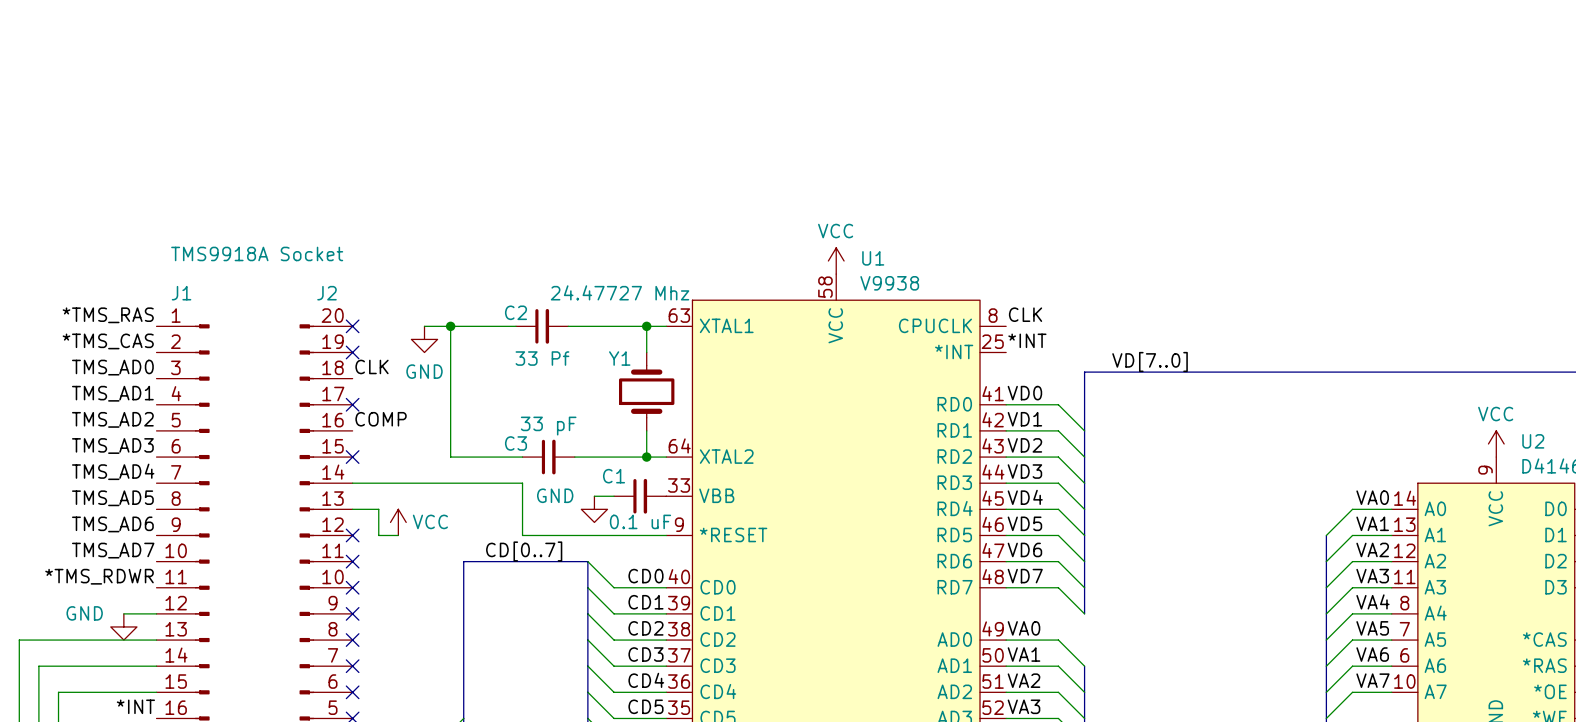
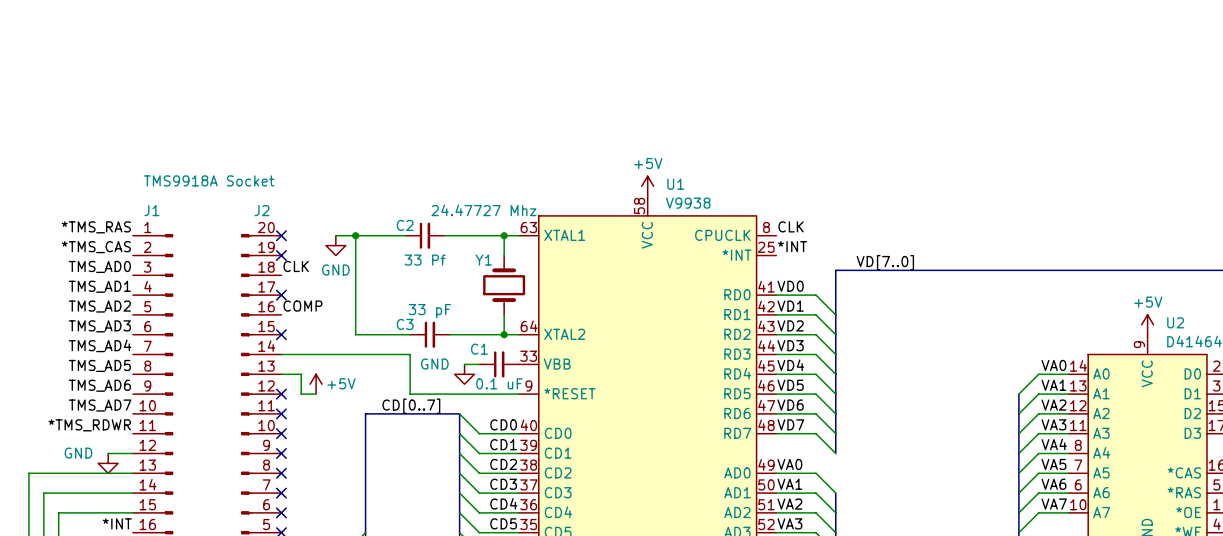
power symbol: VCC (836, 260) -> +5V (647, 186)
power symbol: VCC (1496, 443) -> +5V (1147, 324)
power symbol: VCC (398, 522) -> +5V (316, 384)

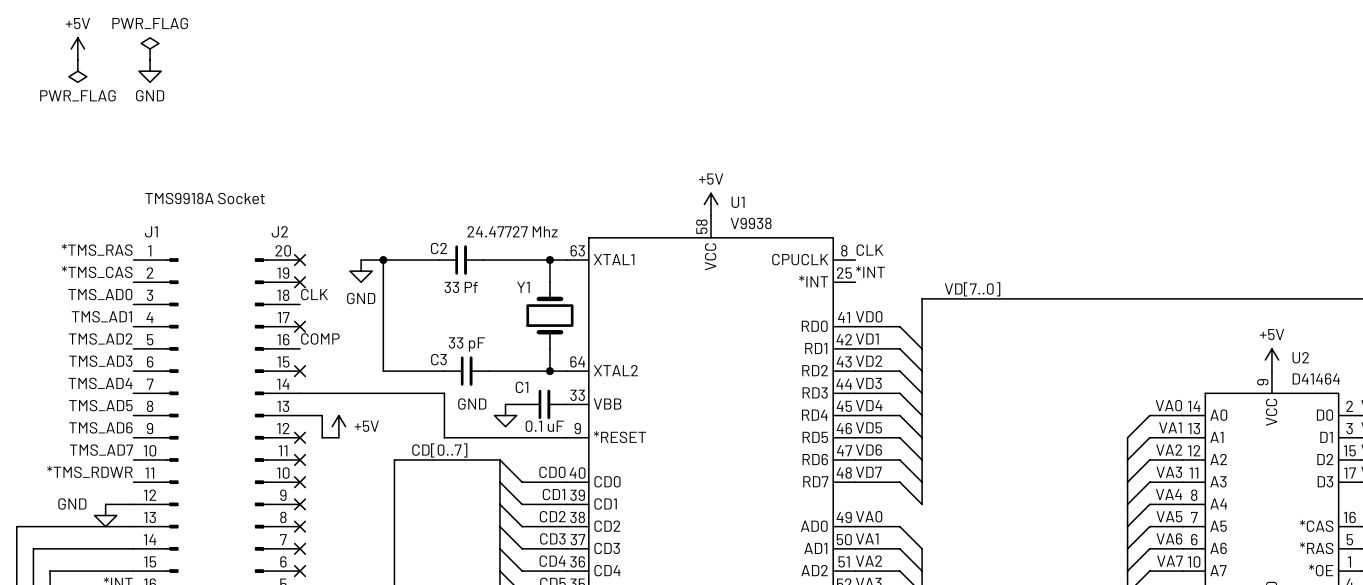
power symbol: none -> +5V (77, 48)
power symbol: none -> PWR_FLAG (150, 48)
power symbol: none -> PWR_FLAG (77, 71)
power symbol: none -> GND (150, 71)

